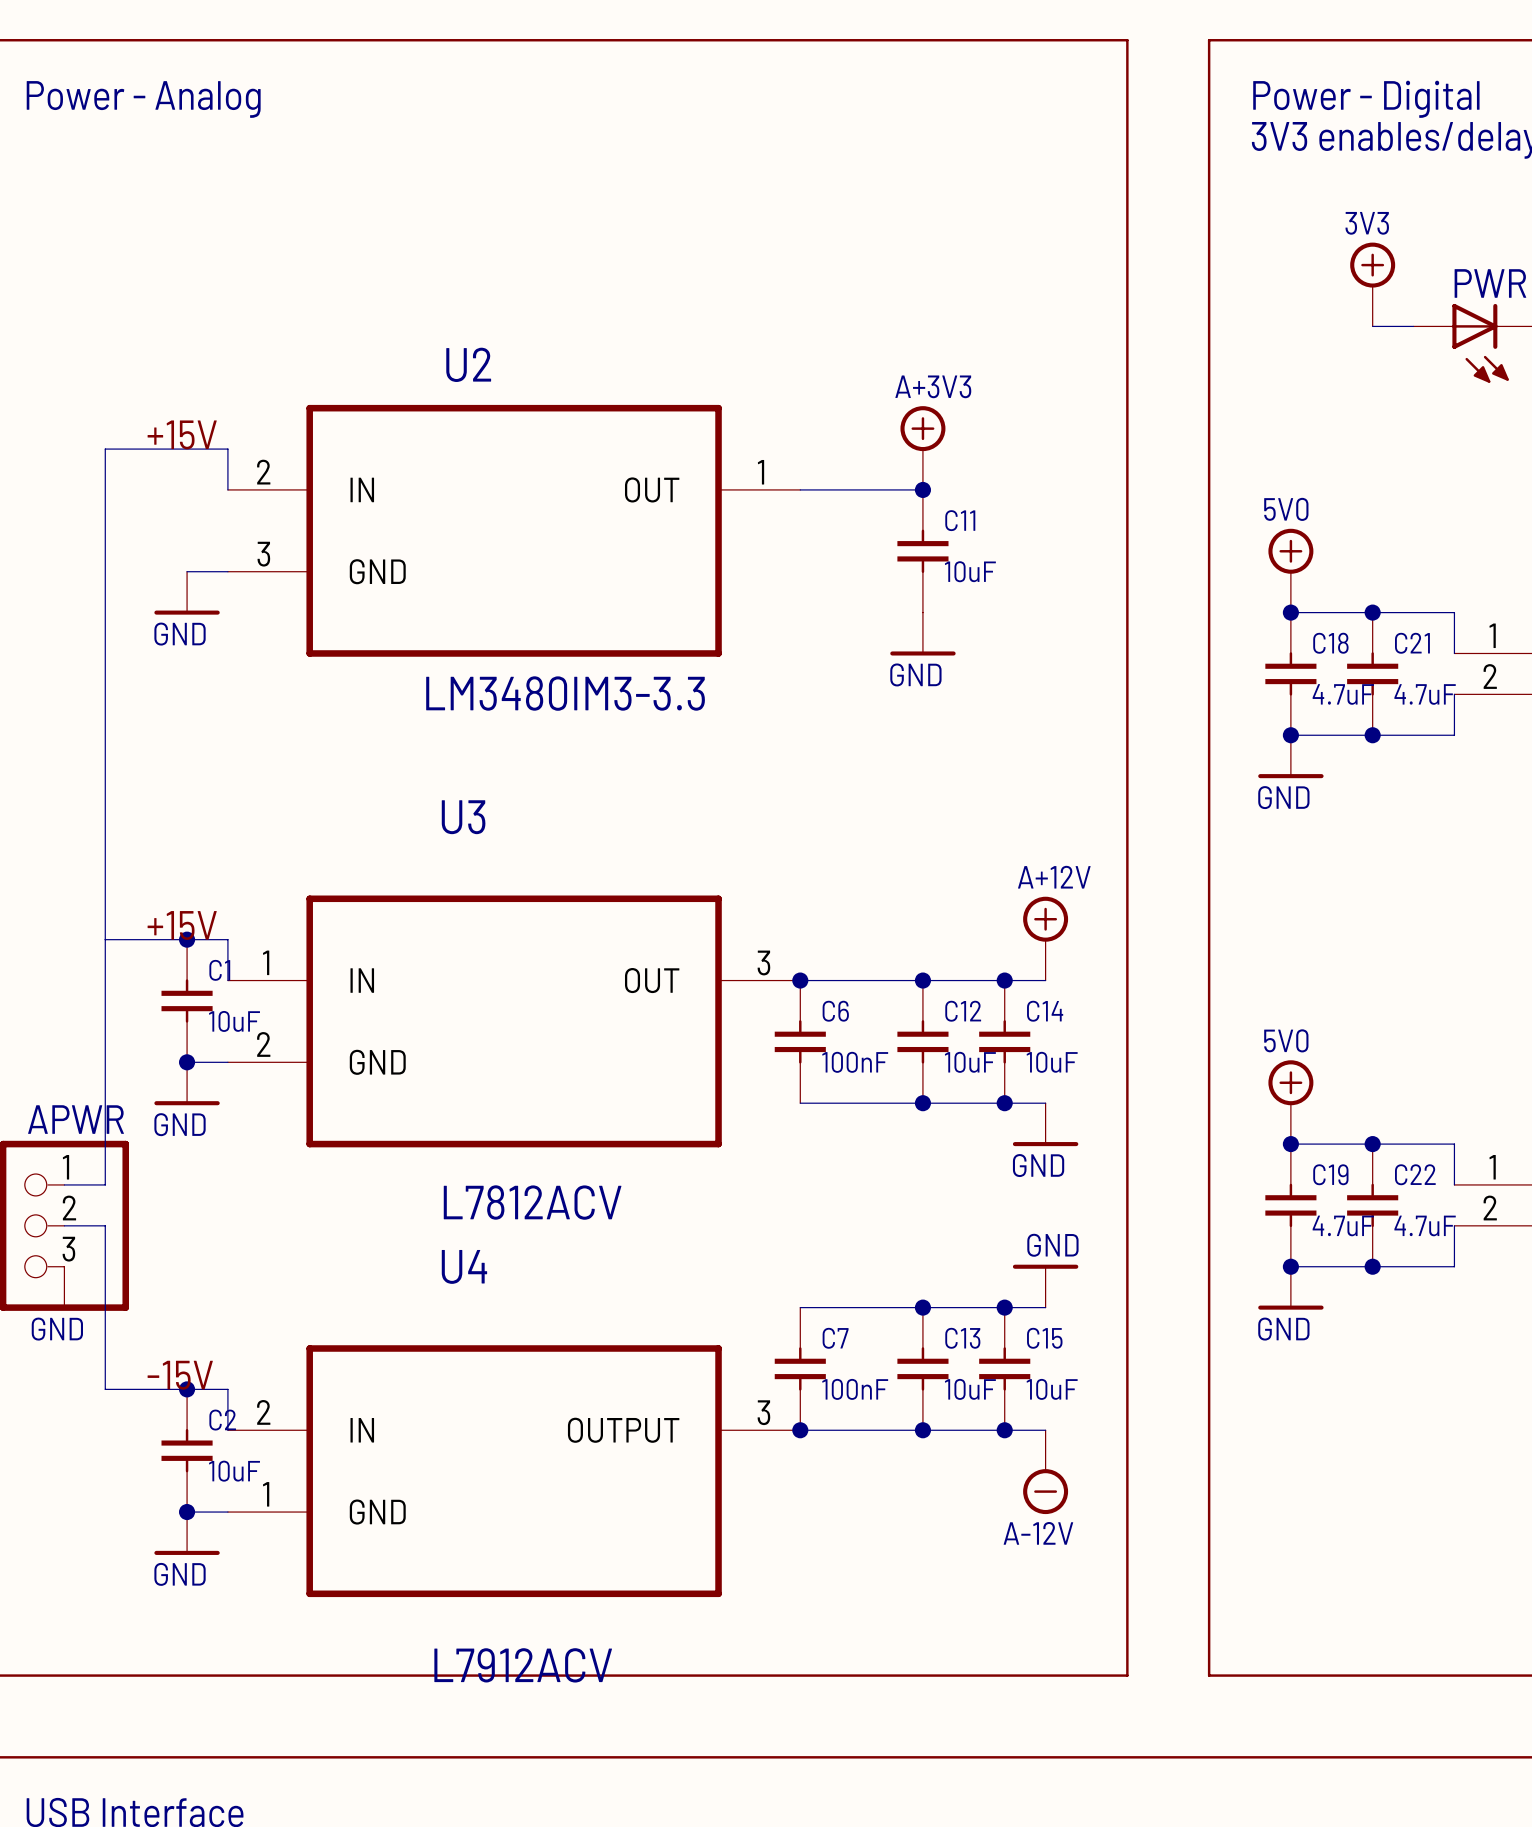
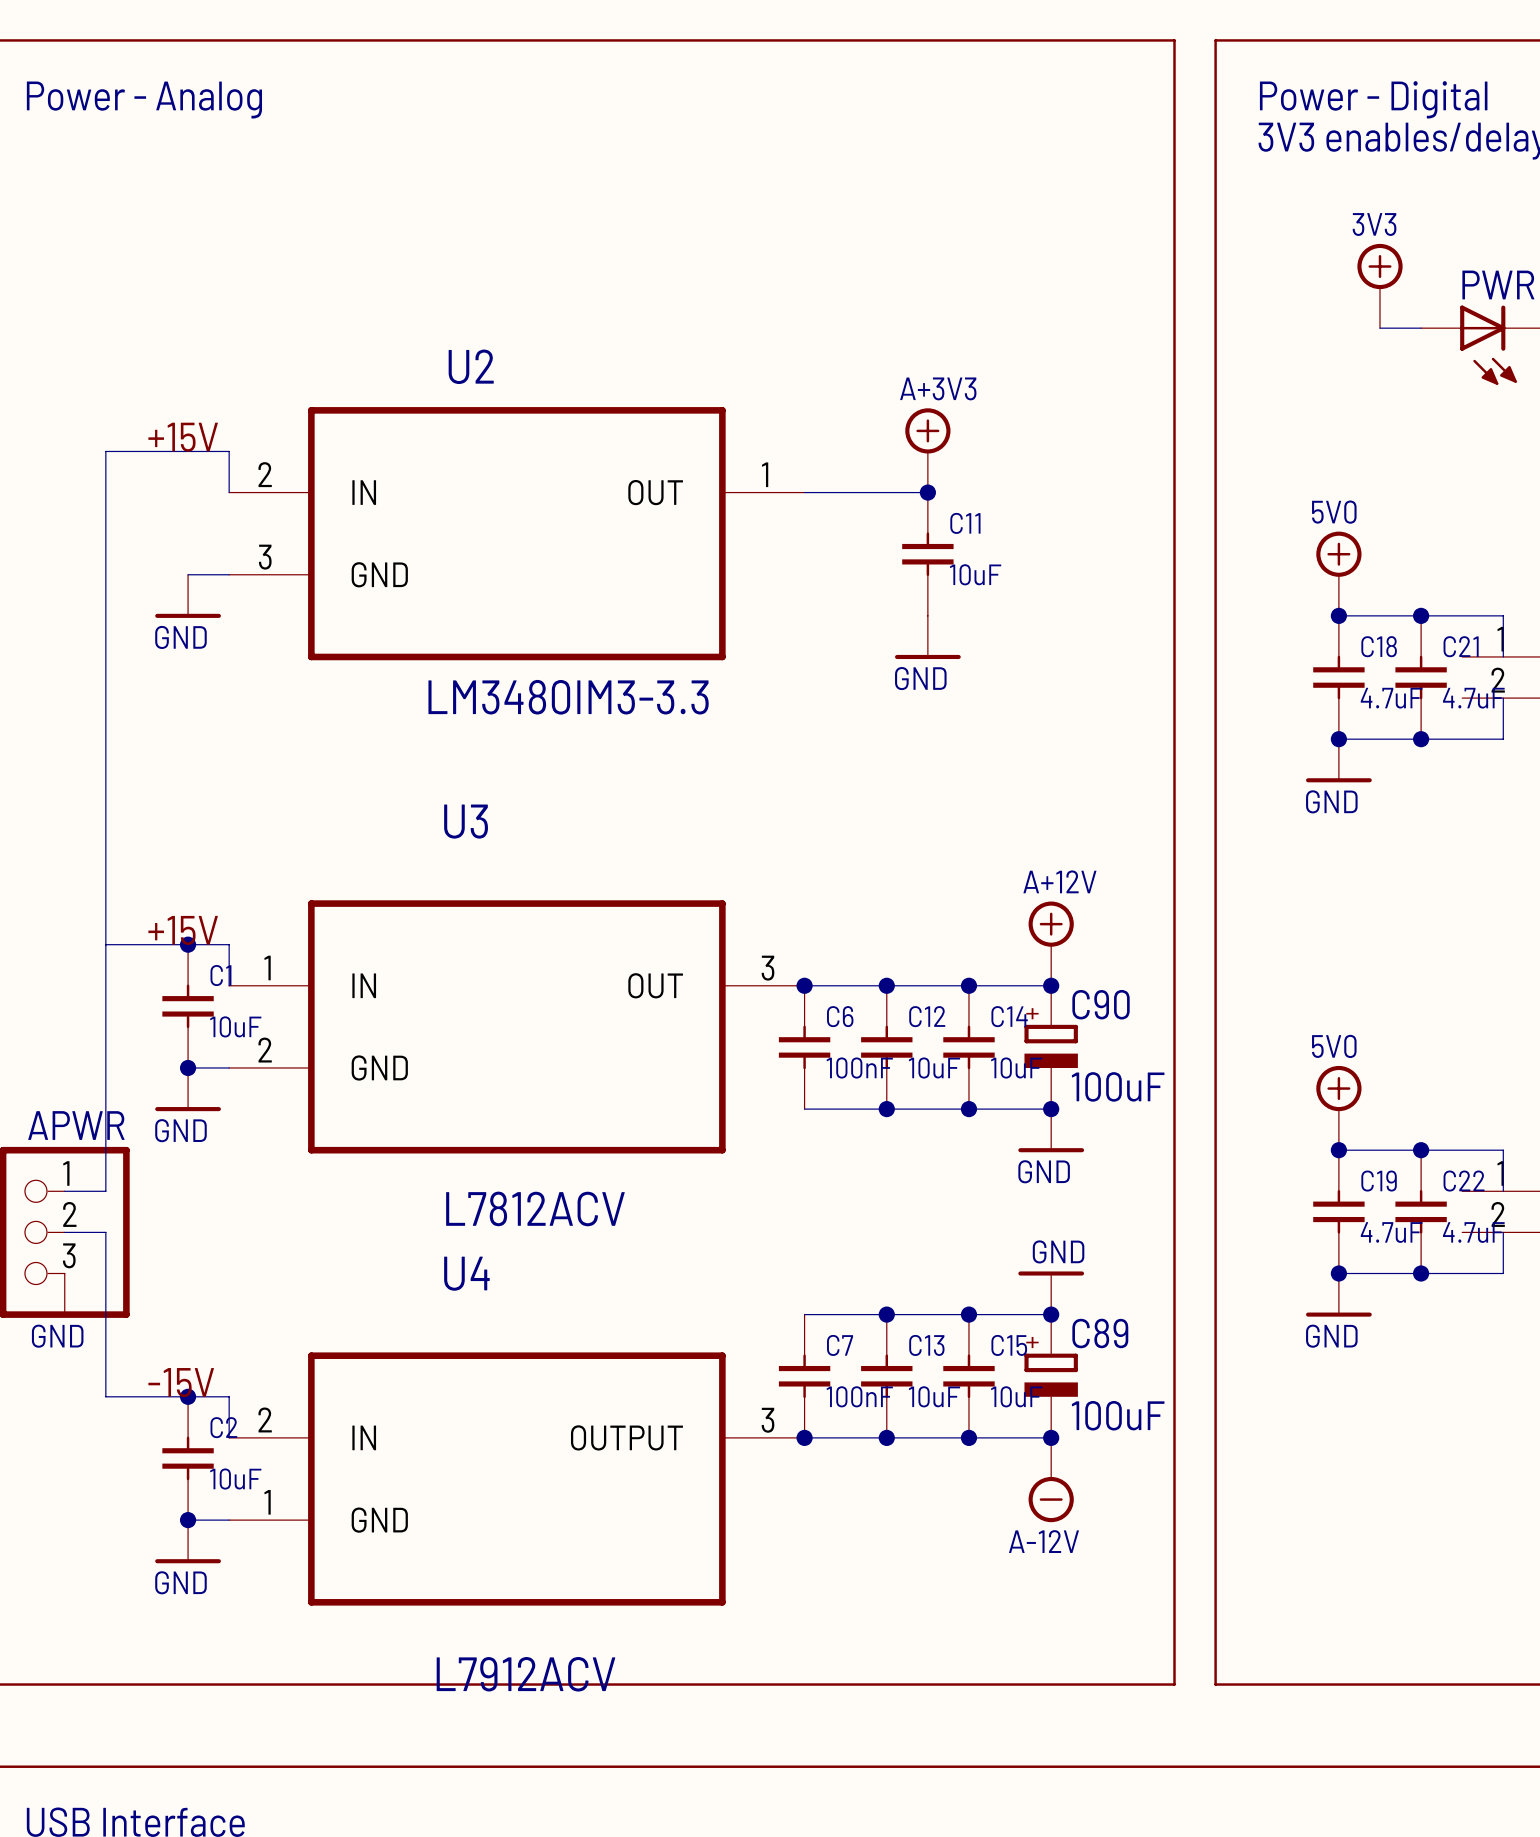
line: (1127, 40) (1127, 1675) -> (1133, 40) (1174, 40) (1174, 1684) (1133, 1684)
power symbol position: 5V0 (1290, 570) -> 5V0 (1338, 573)
wire: (1290, 612) (1331, 612) -> none
junction: (1290, 612) -> none
junction: none -> (1338, 615)
junction: (1372, 612) -> none
junction: none -> (1421, 615)
wire: (1454, 612) (1454, 653) -> (1462, 615) (1503, 615) (1503, 656)
C18 position: (1290, 673) -> (1338, 677)
C21 position: (1372, 673) -> (1421, 677)
wire: (1454, 694) (1454, 735) -> (1503, 698) (1503, 739) (1462, 739)
wire: (1290, 735) (1331, 735) -> none
junction: (1290, 735) -> none
junction: none -> (1338, 739)
junction: (1372, 735) -> none
junction: none -> (1421, 739)
power symbol position: GND (1290, 756) -> GND (1338, 760)
junction: none -> (886, 985)
junction: (922, 980) -> none
junction: none -> (968, 985)
junction: (1004, 980) -> none
junction: none -> (1051, 985)
C12 position: (922, 1041) -> (886, 1047)
C14 position: (1004, 1041) -> (968, 1047)
C90: none -> 100uF (1051, 1047)
power symbol position: 5V0 (1290, 1102) -> 5V0 (1338, 1108)
junction: none -> (886, 1109)
junction: (922, 1103) -> none
junction: none -> (968, 1109)
junction: (1004, 1103) -> none
junction: none -> (1051, 1109)
wire: (1290, 1144) (1331, 1144) -> none
junction: (1290, 1144) -> none
junction: none -> (1338, 1150)
junction: (1372, 1144) -> none
junction: none -> (1421, 1150)
wire: (1454, 1144) (1454, 1184) -> (1462, 1150) (1503, 1150) (1503, 1191)
C19 position: (1290, 1205) -> (1338, 1211)
C22 position: (1372, 1205) -> (1421, 1211)
wire: (1454, 1225) (1454, 1266) -> (1503, 1232) (1503, 1273) (1462, 1273)
wire: (1290, 1266) (1331, 1266) -> none
junction: (1290, 1266) -> none
junction: none -> (1338, 1273)
junction: (1372, 1266) -> none
junction: none -> (1421, 1273)
power symbol position: GND (1290, 1288) -> GND (1338, 1295)
junction: none -> (886, 1314)
junction: (922, 1307) -> none
junction: none -> (968, 1314)
junction: (1004, 1307) -> none
junction: none -> (1051, 1314)
C13 position: (922, 1368) -> (886, 1376)
C15 position: (1004, 1368) -> (968, 1376)
C89: none -> 100uF (1051, 1376)
junction: none -> (886, 1437)
junction: (922, 1430) -> none
junction: none -> (968, 1437)
junction: (1004, 1430) -> none
junction: none -> (1051, 1437)

